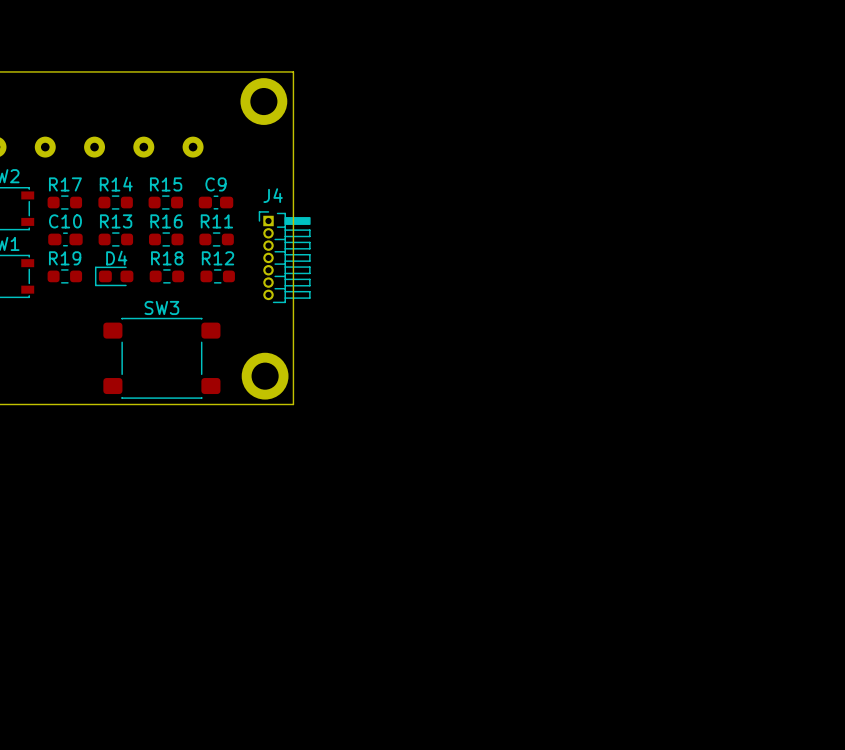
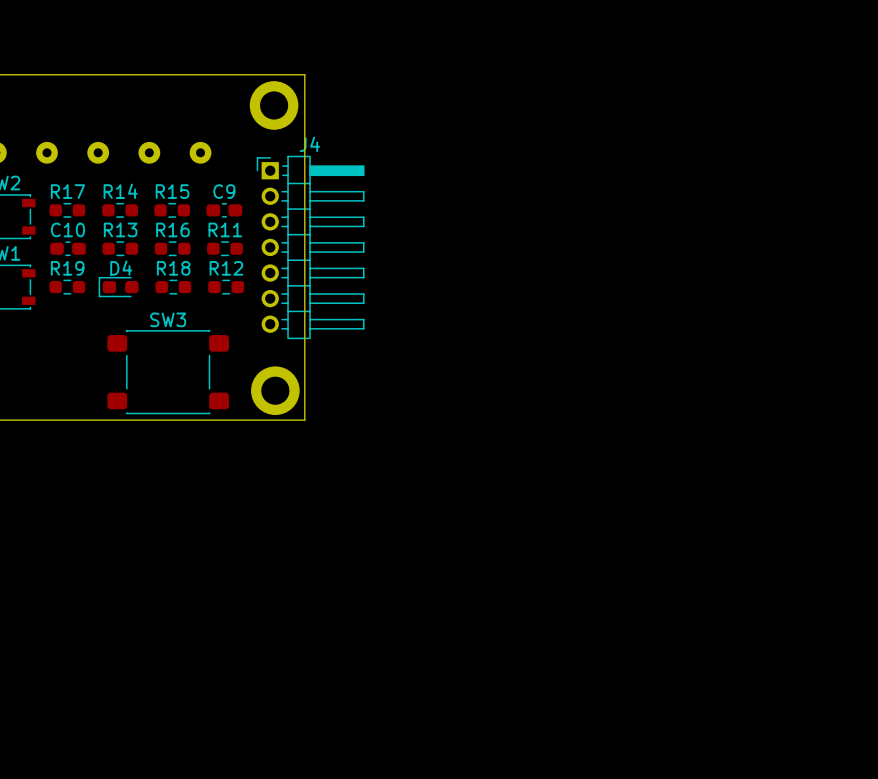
J4 name position: J4 (273, 195) -> J4 (309, 144)
J4 footprint: [258, 211, 311, 304] -> [256, 155, 365, 340]

